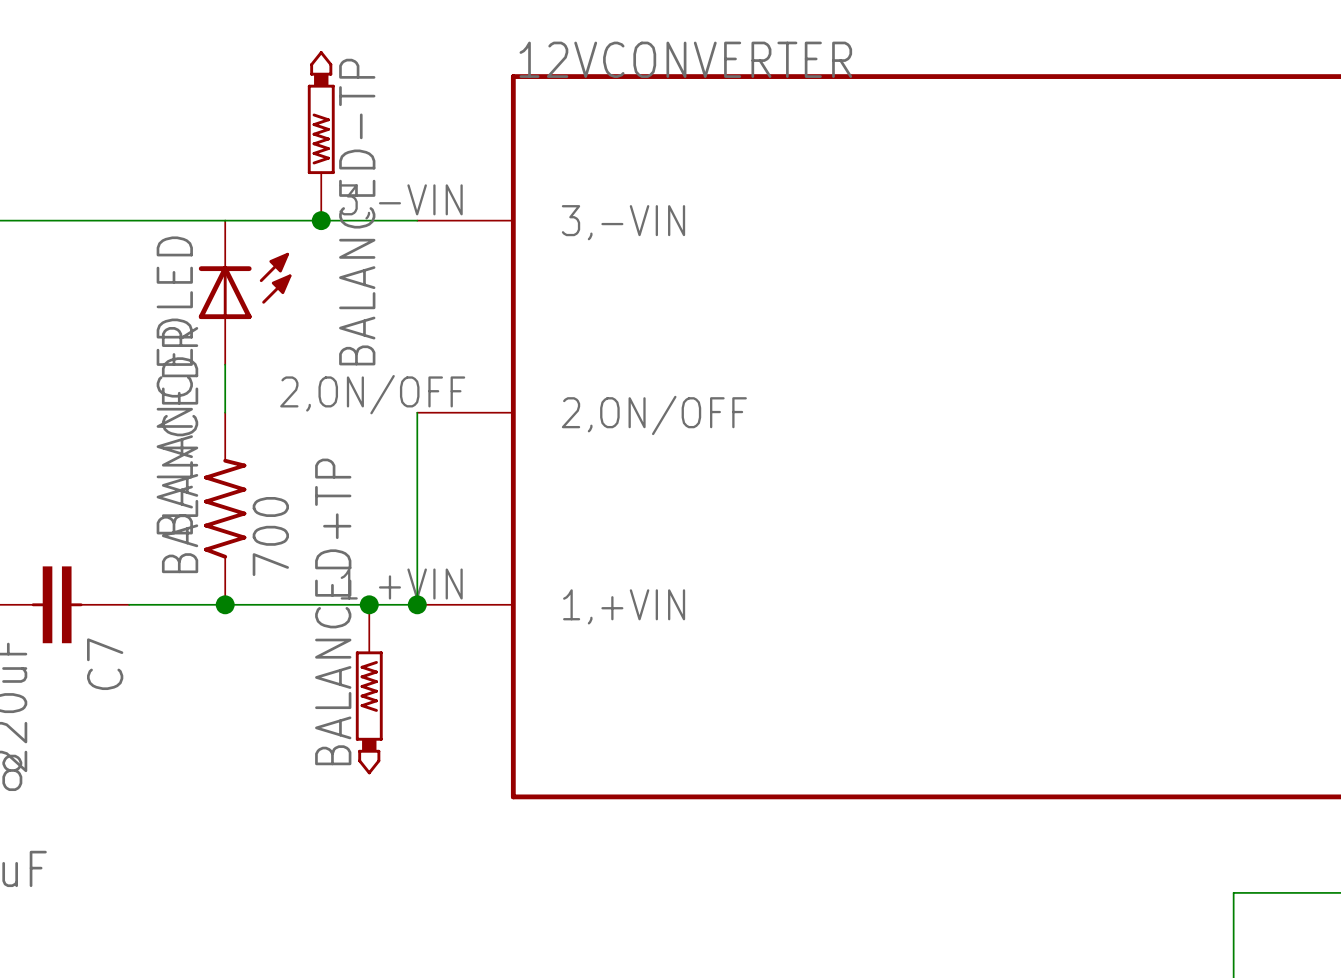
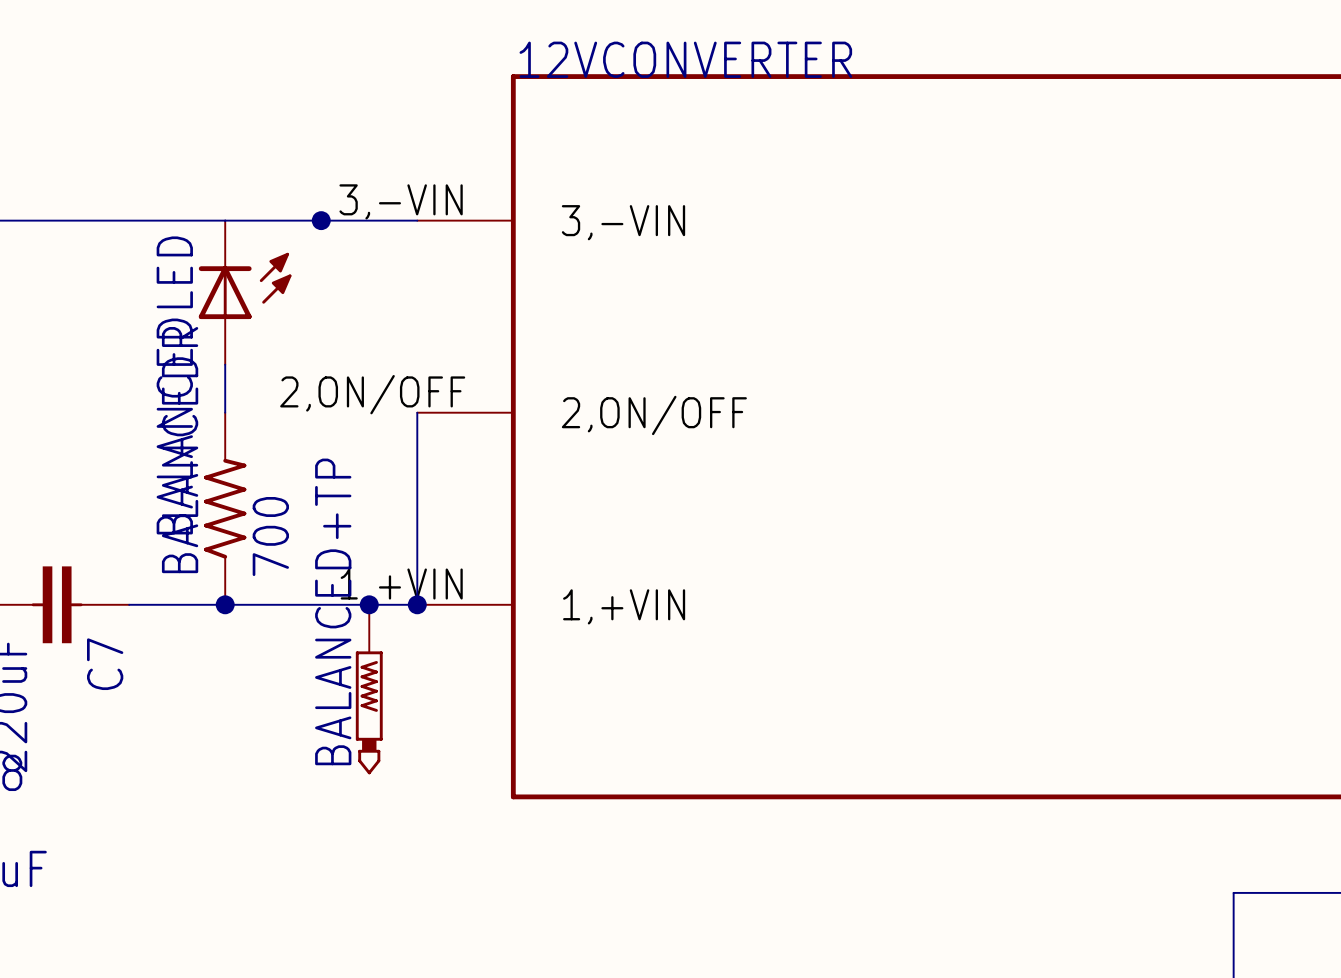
BALANCED-TP: (321, 135) -> none

